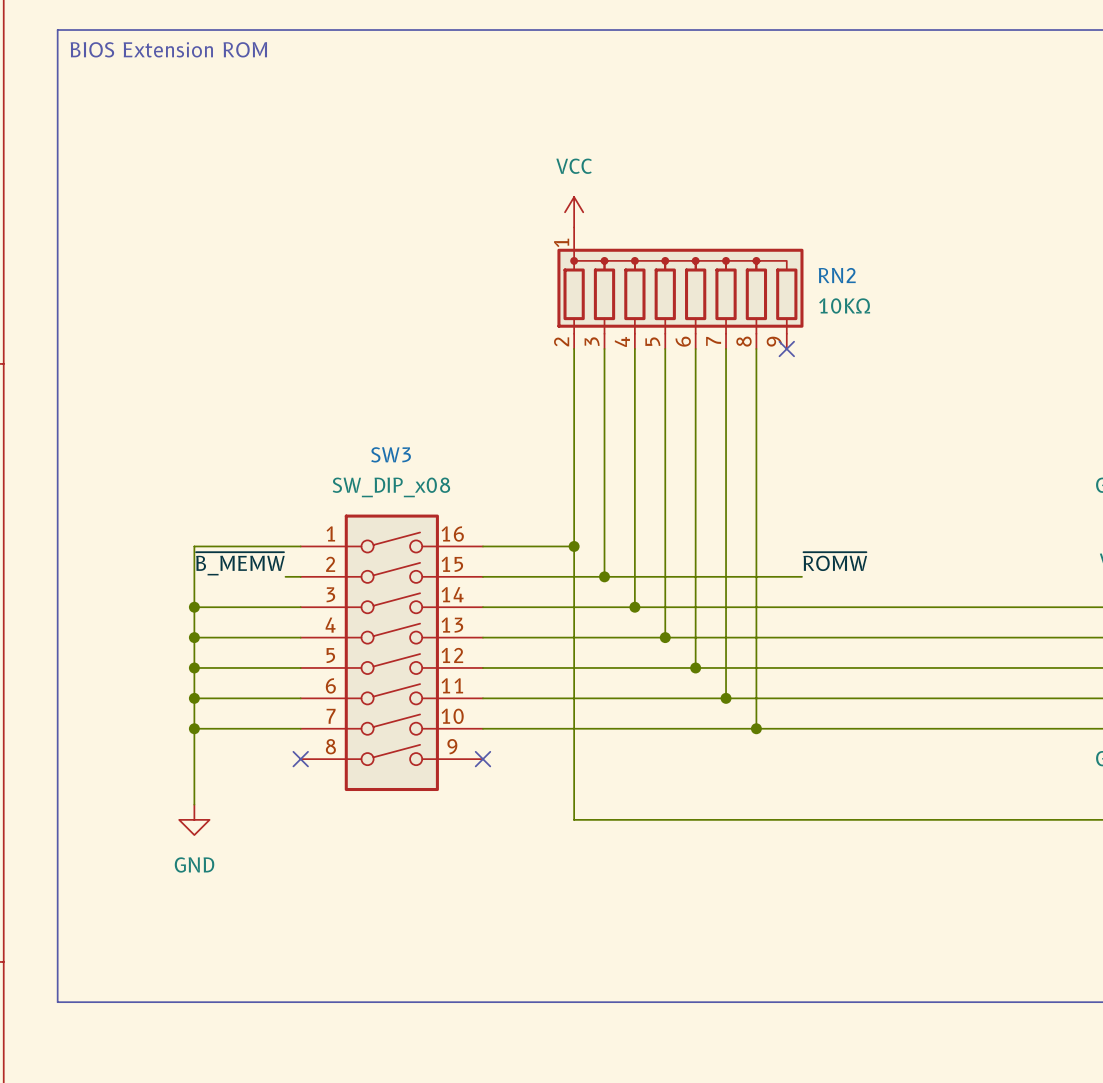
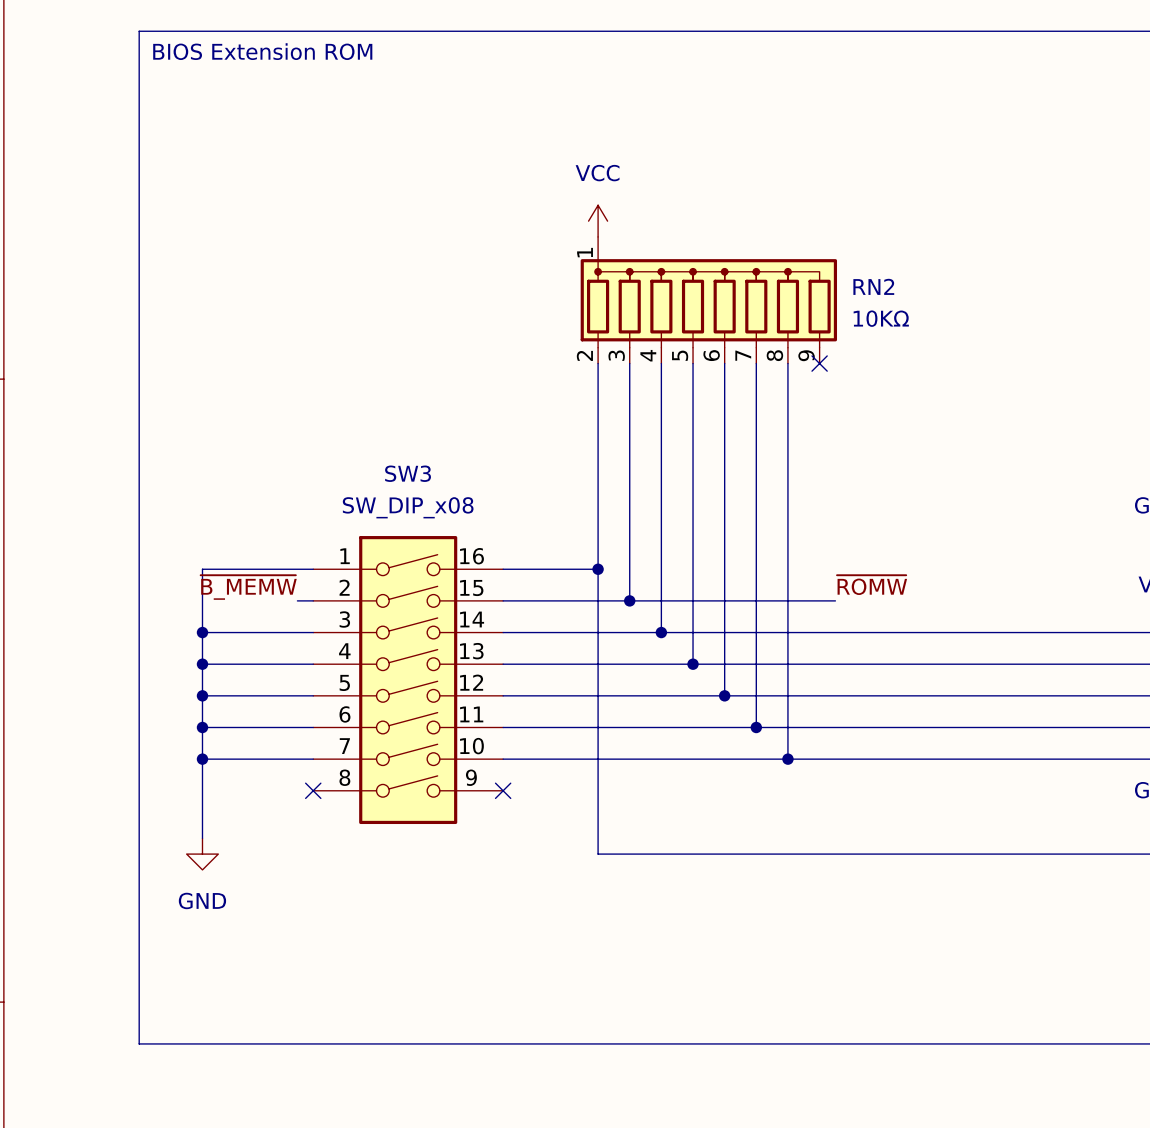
line: (133, 30) (57, 30) (57, 1002) (133, 1002) -> (139, 31) (139, 1043)
text position: BIOS Extension ROM (168, 49) -> BIOS Extension ROM (262, 51)

